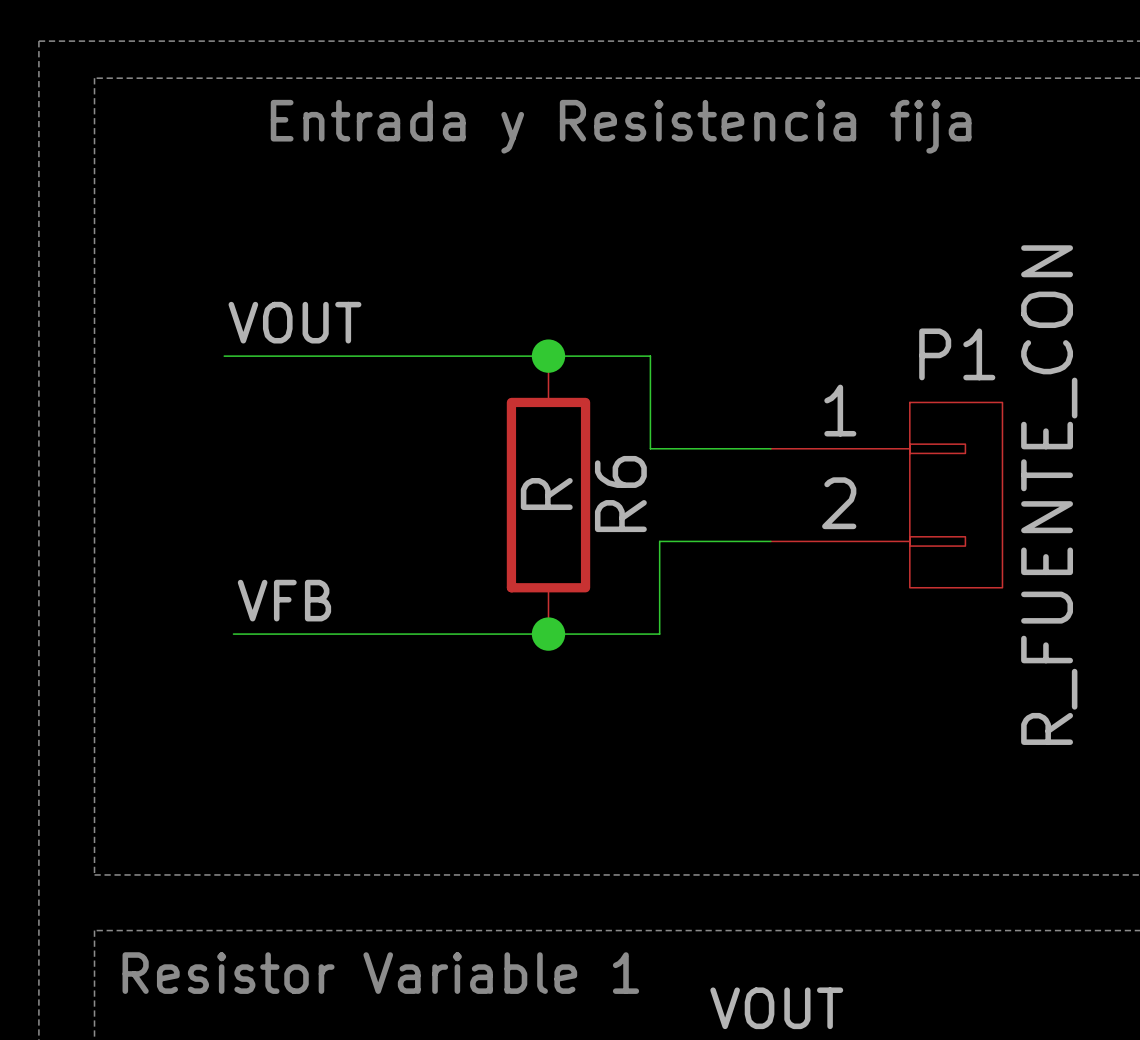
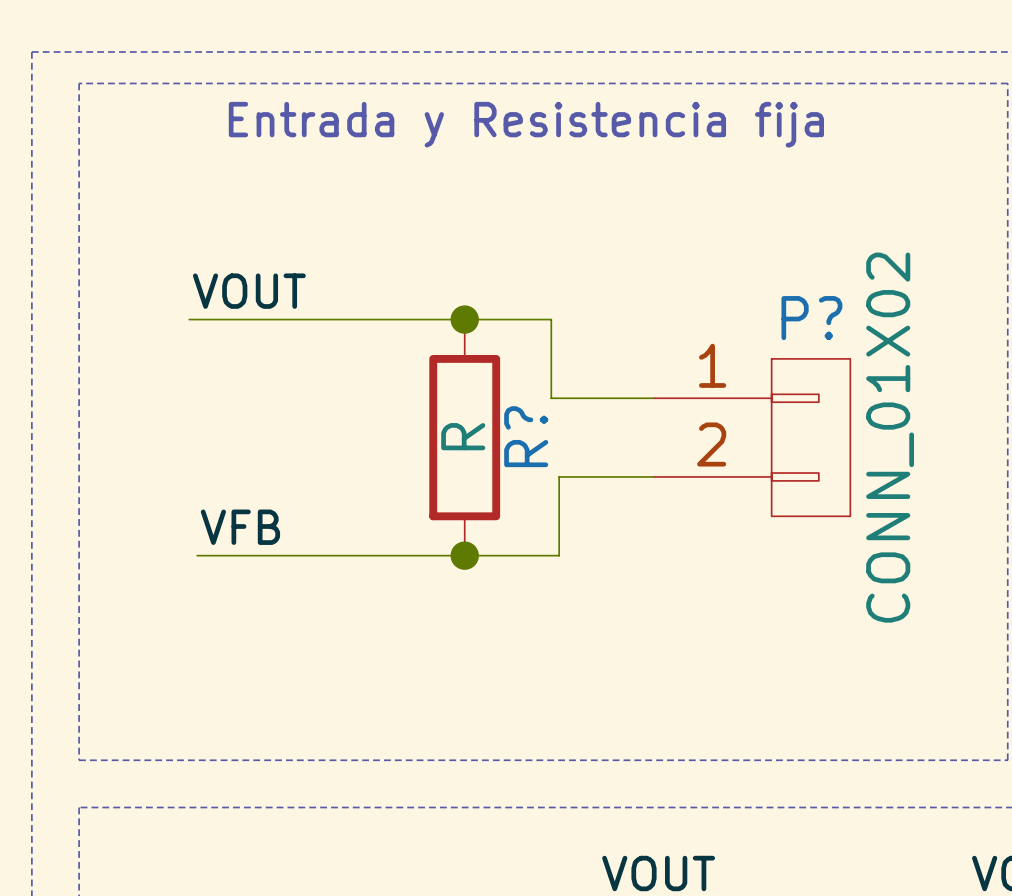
P1 name: P1 (957, 354) -> P? (811, 318)
R6 name: R6 (620, 494) -> R? (526, 436)
P1 value: R_FUENTE_CON (1049, 495) -> CONN_01X02 (890, 437)
text: Resistor Variable 1 (380, 973) -> none

